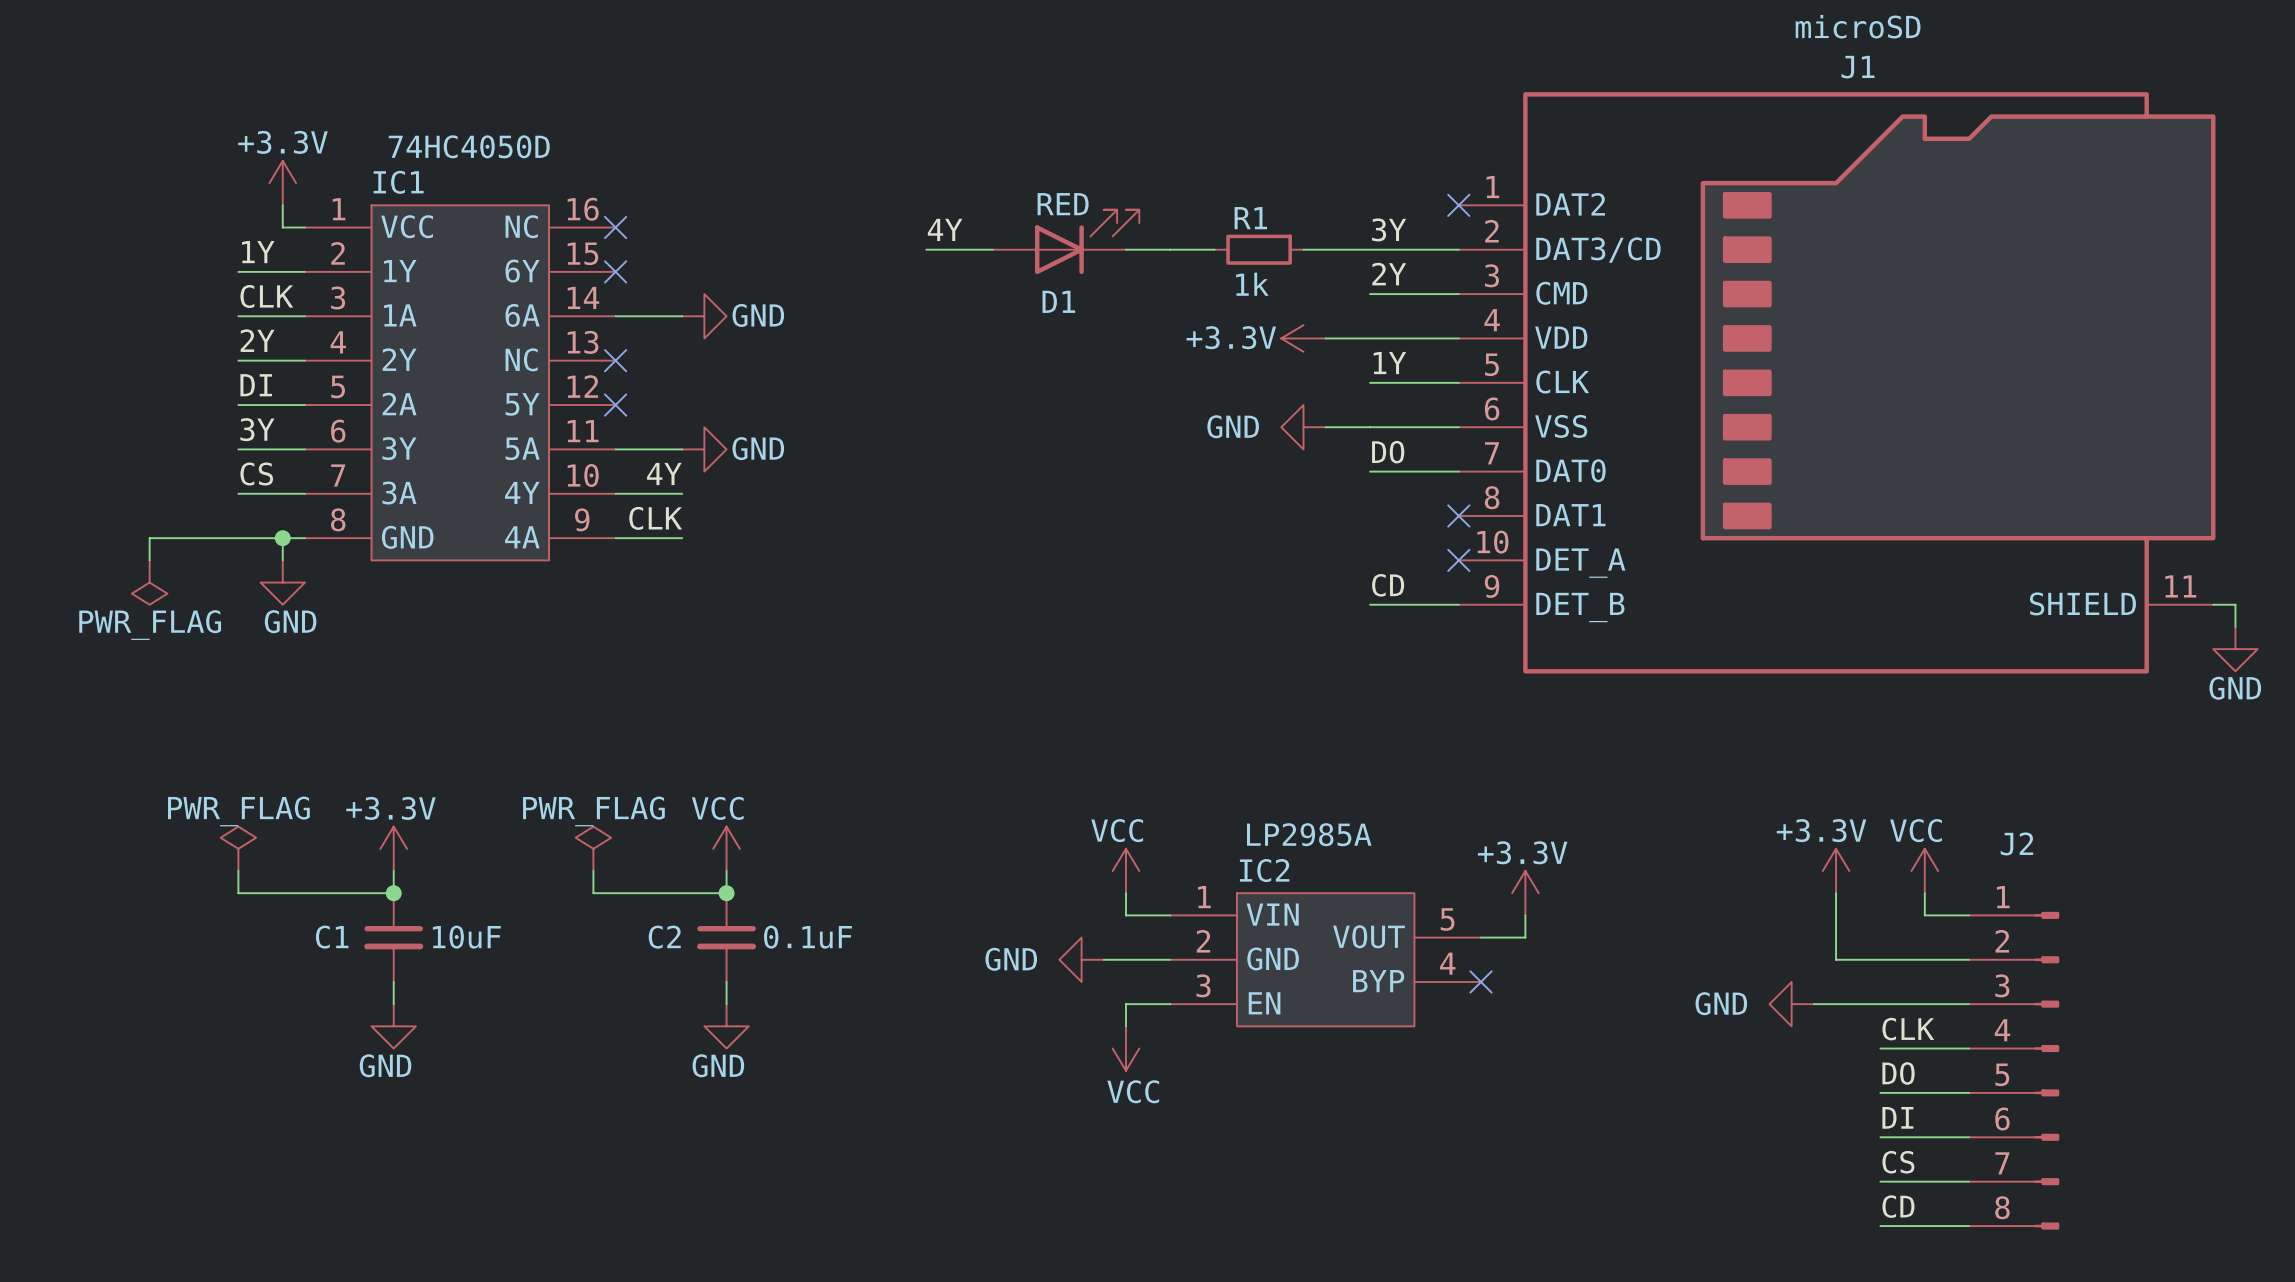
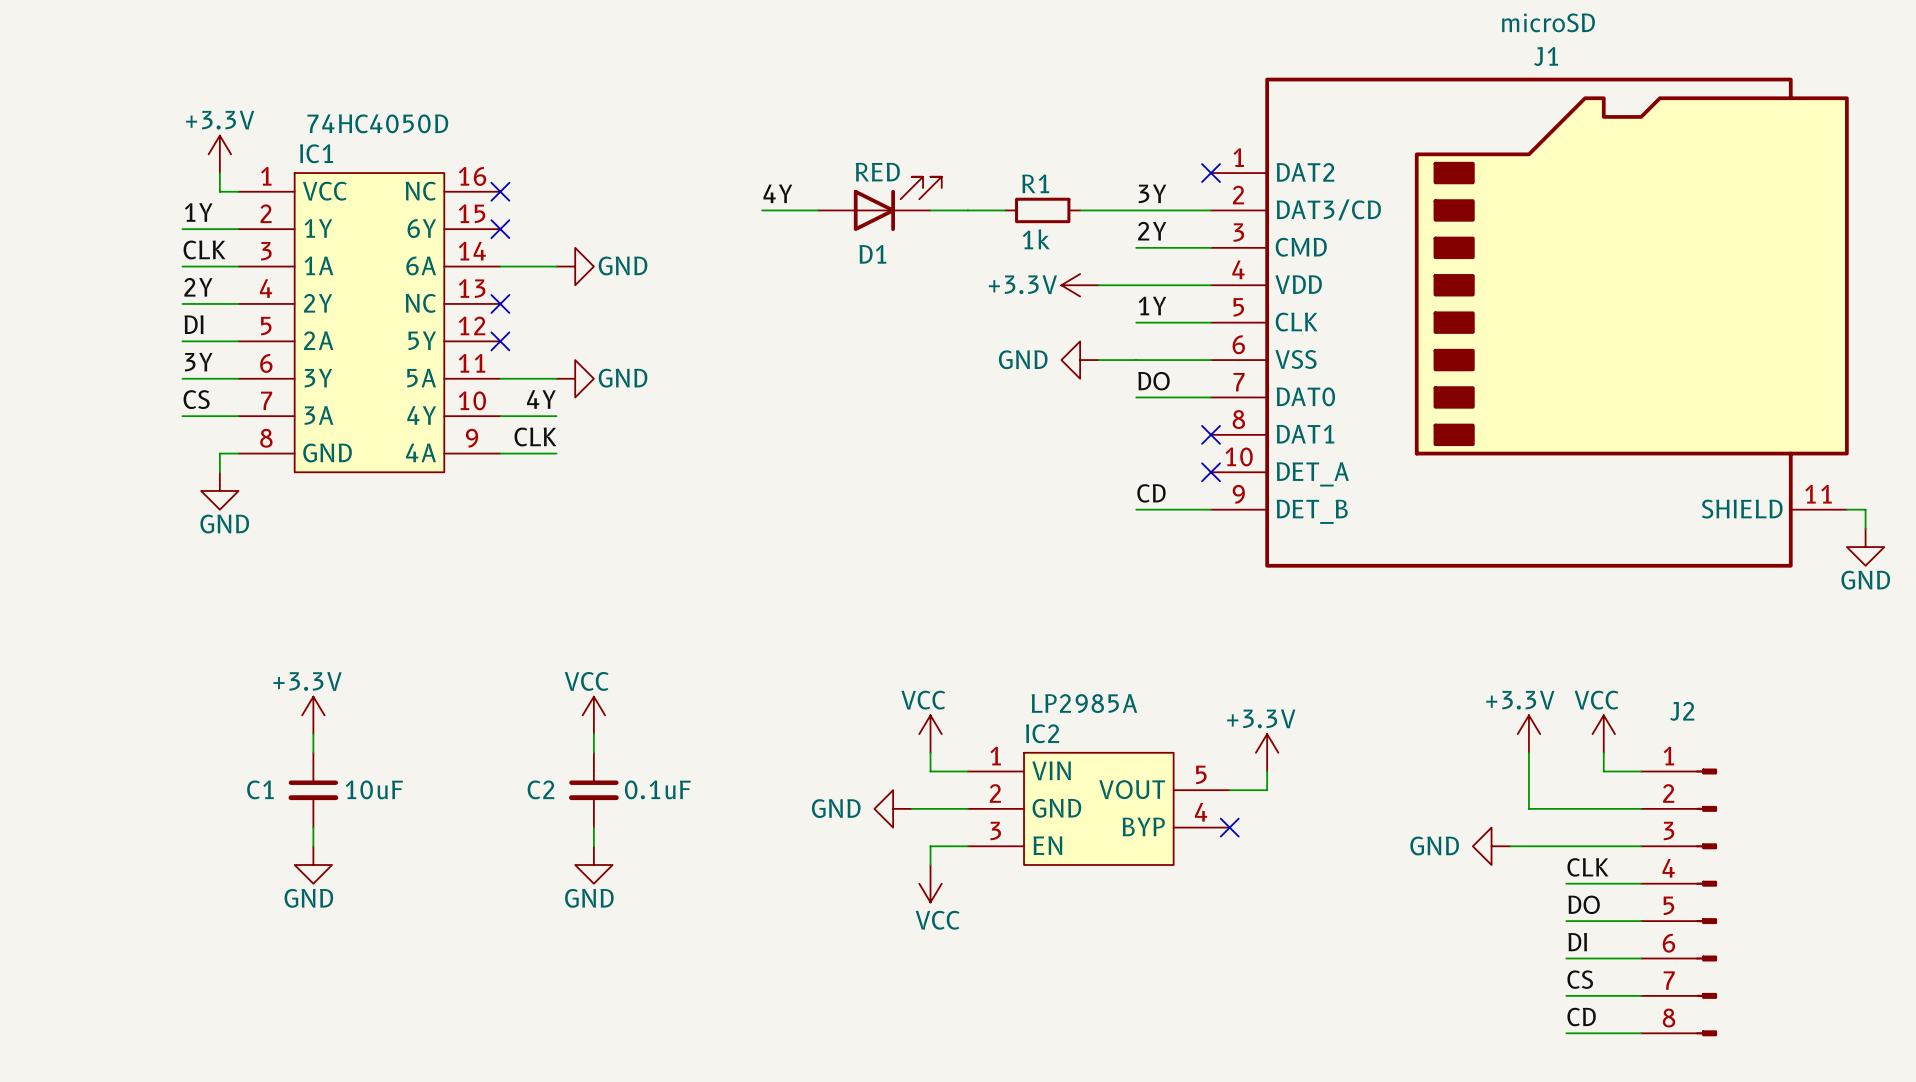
wire: (282, 538) (149, 538) (149, 560) -> none
junction: (282, 538) -> none
power symbol: PWR_FLAG (149, 582) -> none
power symbol: PWR_FLAG (238, 848) -> none
power symbol: PWR_FLAG (593, 848) -> none
wire: (238, 871) (238, 893) (393, 893) -> none
wire: (593, 871) (593, 893) (726, 893) -> none
junction: (393, 893) -> none
junction: (726, 893) -> none

